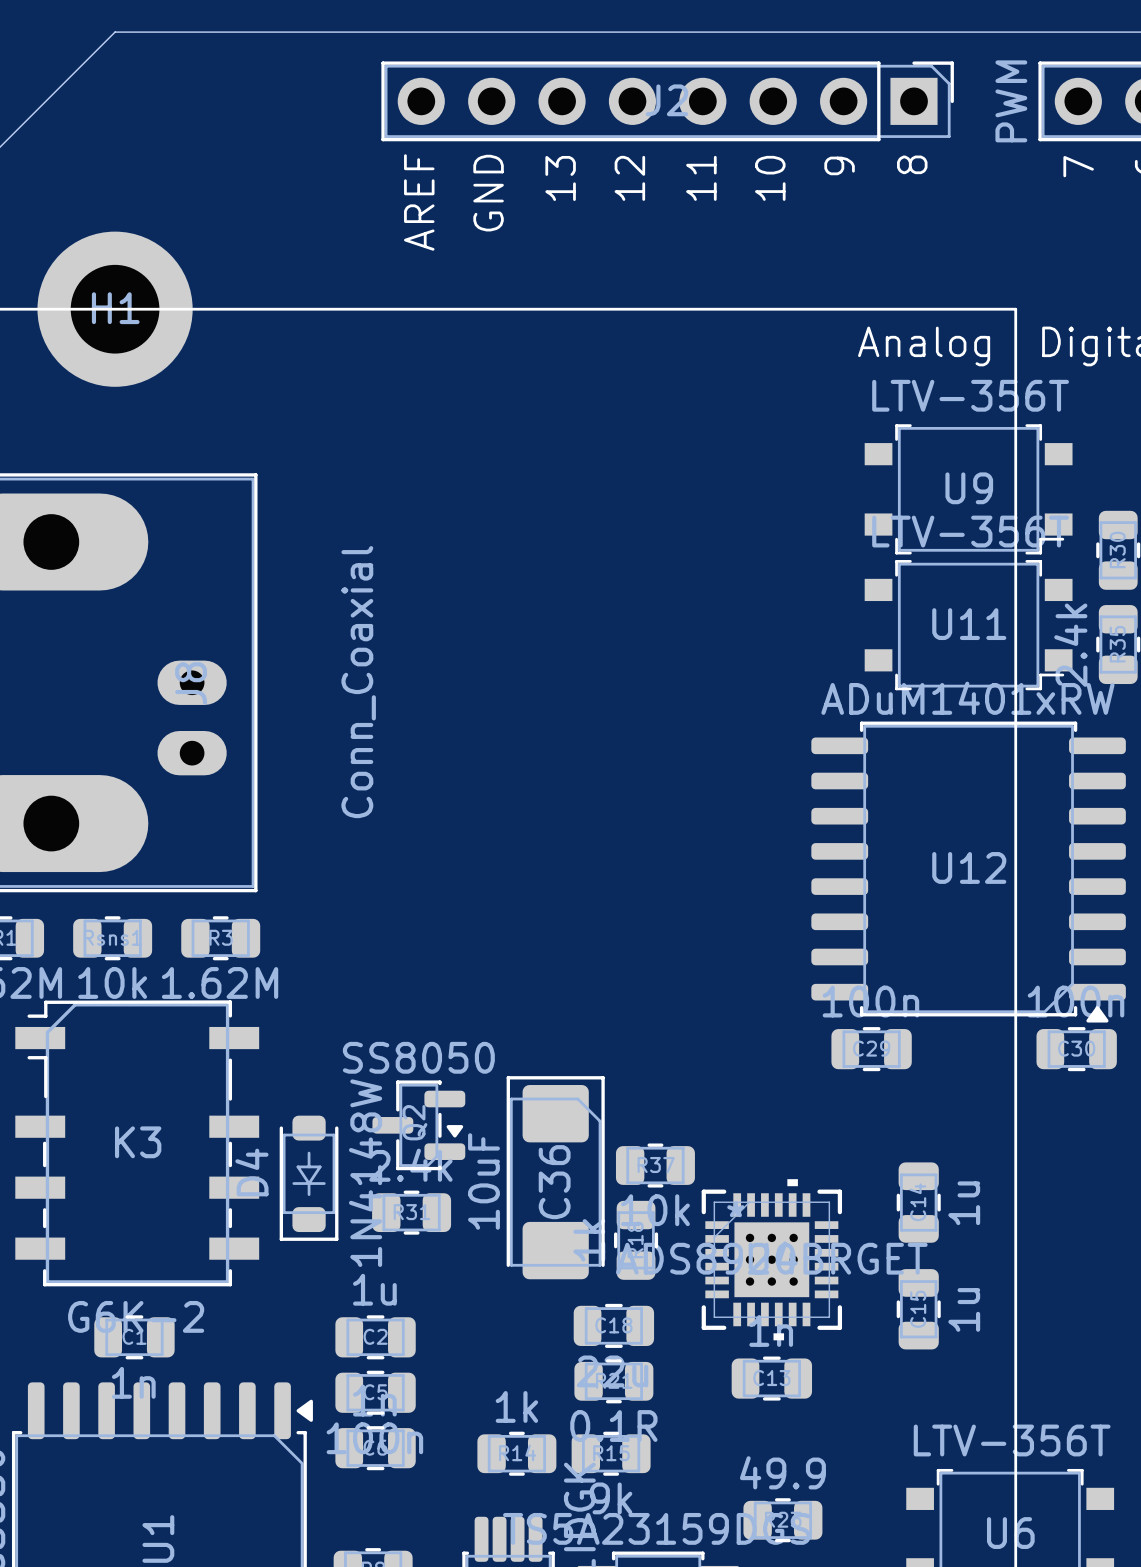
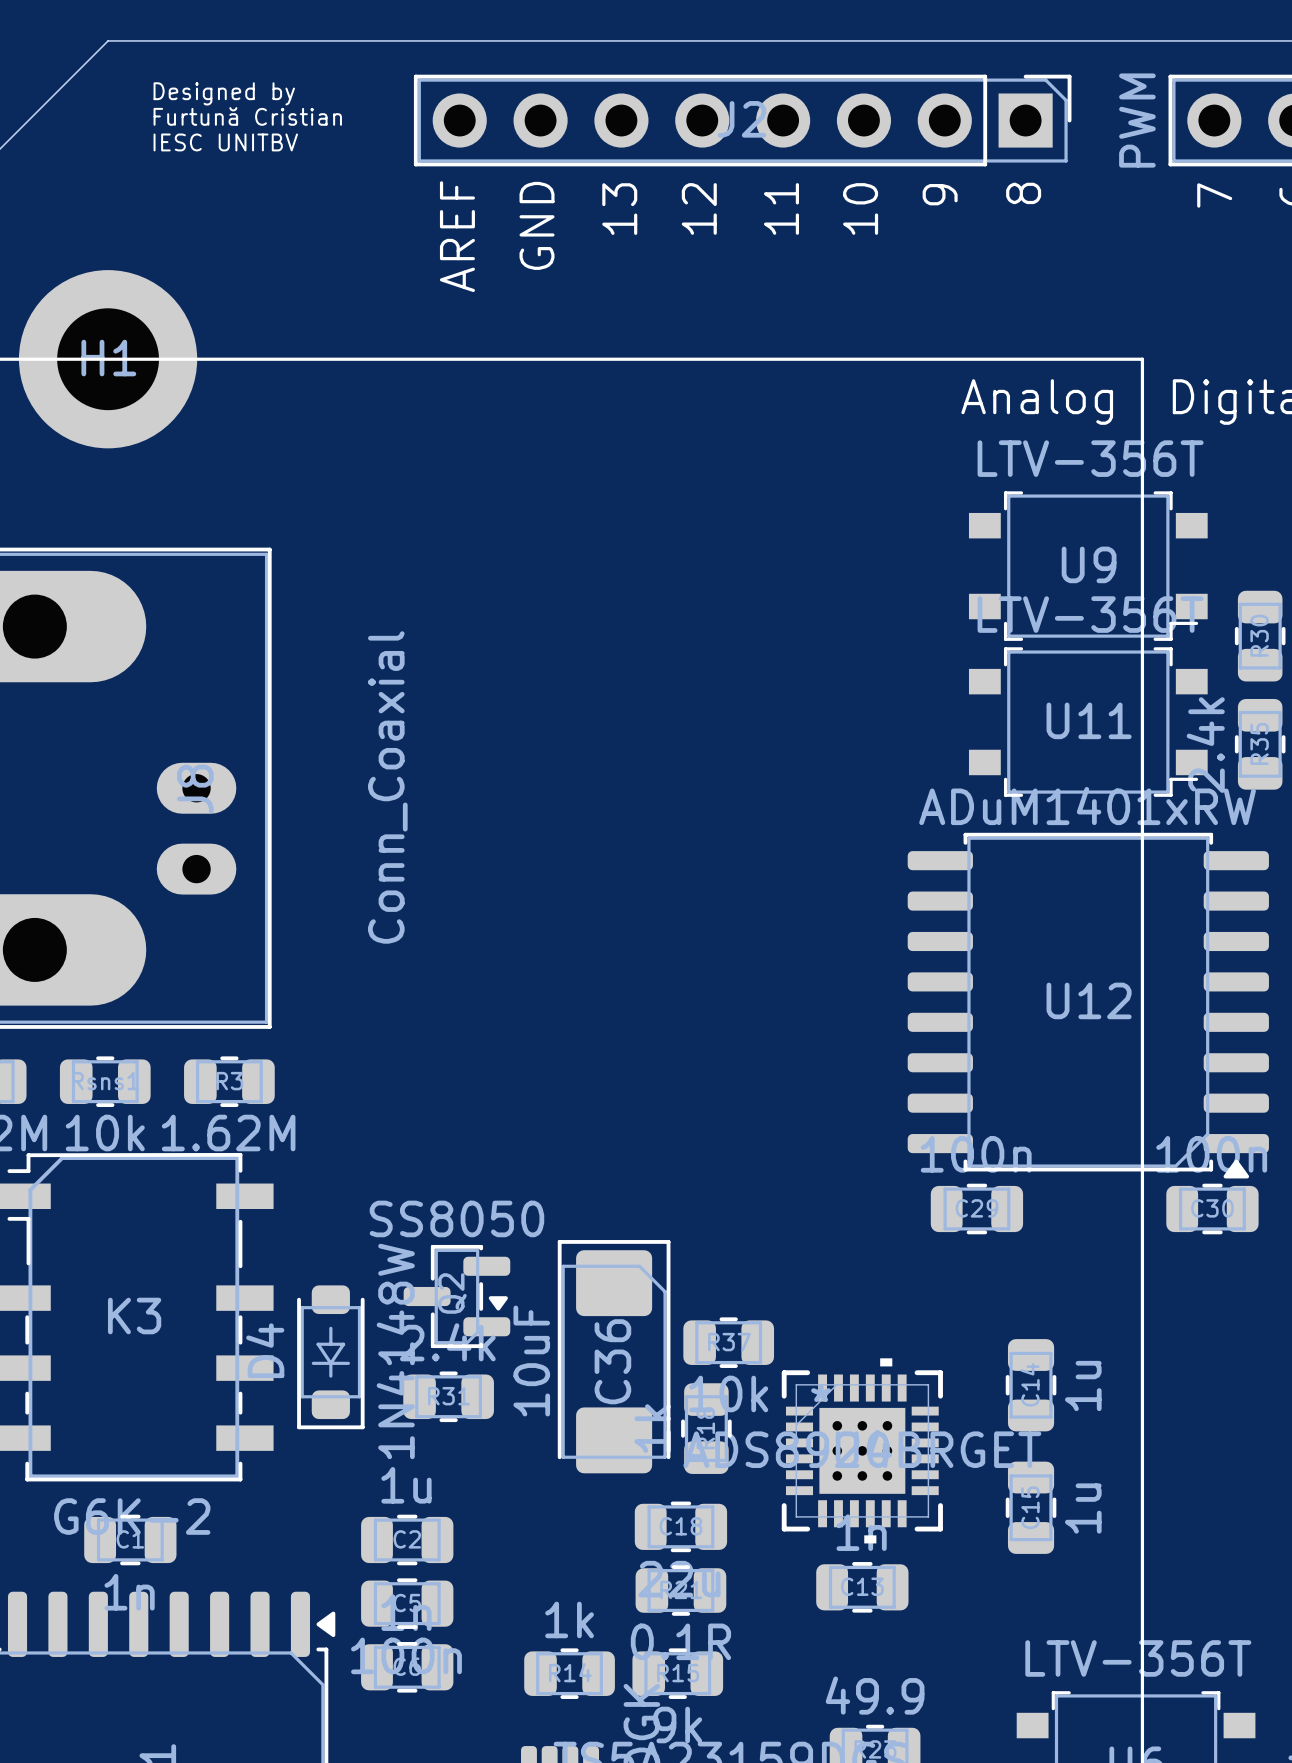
text: none -> Designed by (224, 93)
text: none -> Furtună Cristian (247, 116)
text: none -> IESC UNITBV (225, 142)

